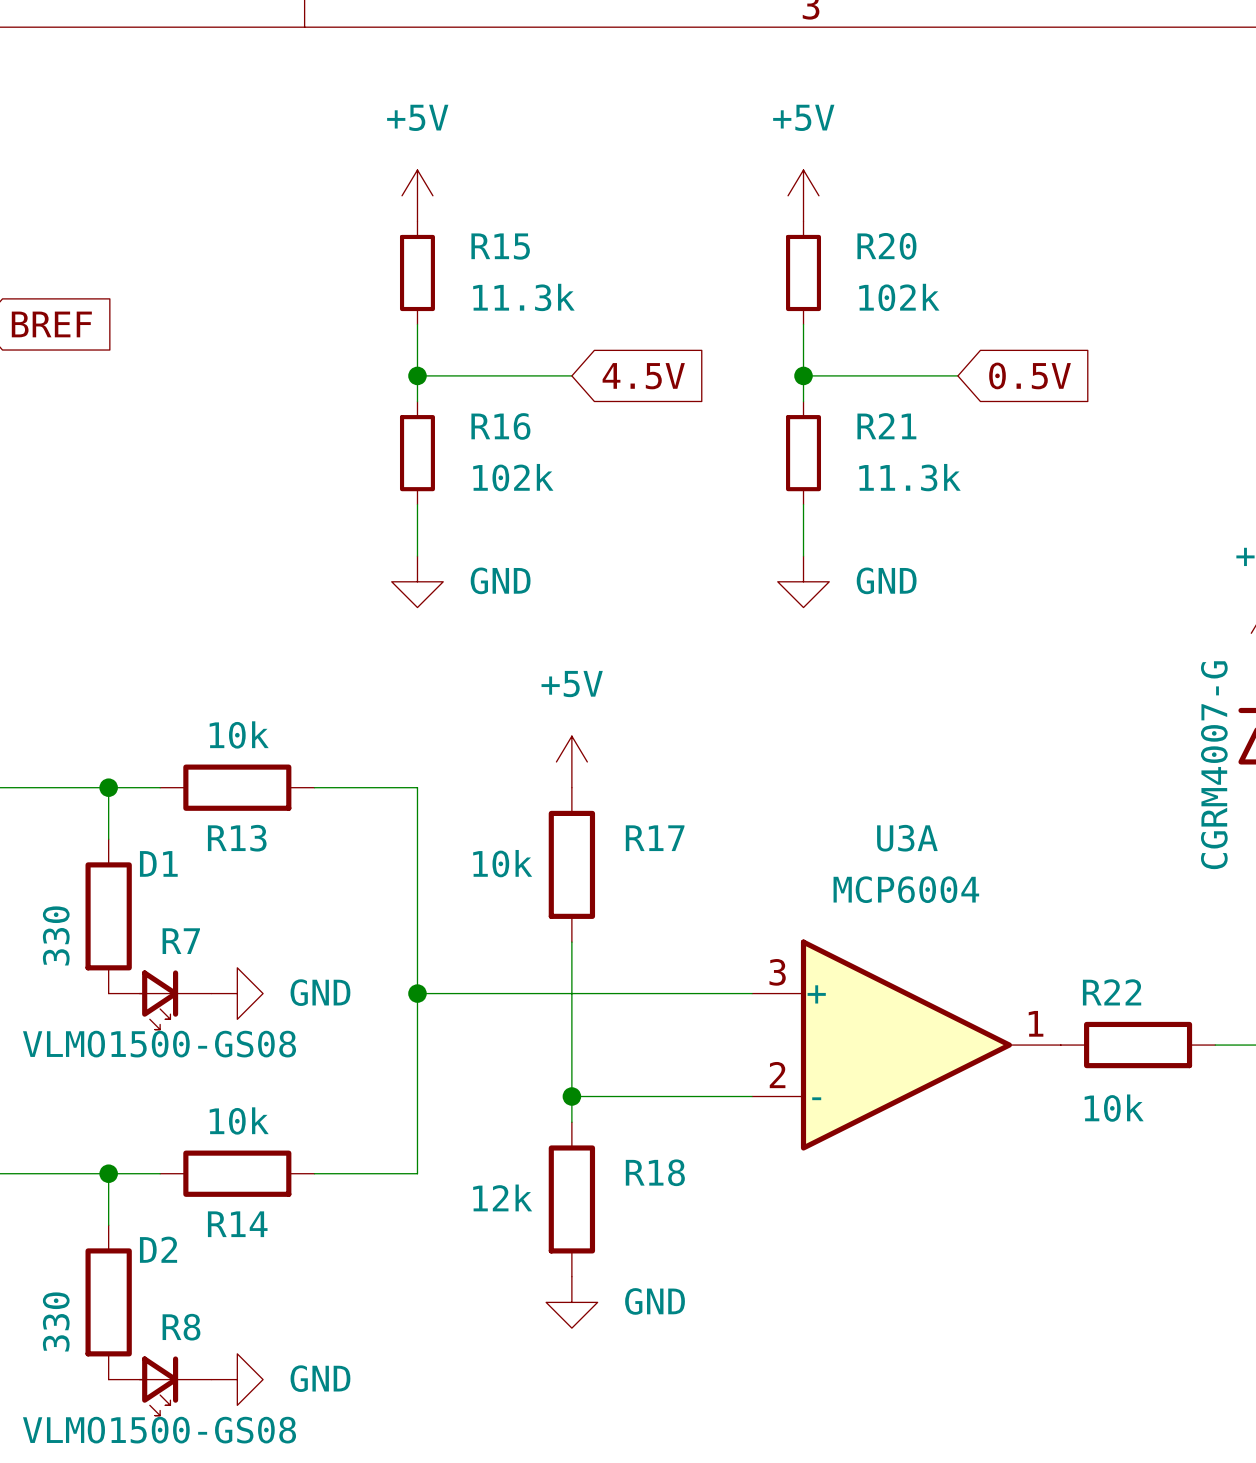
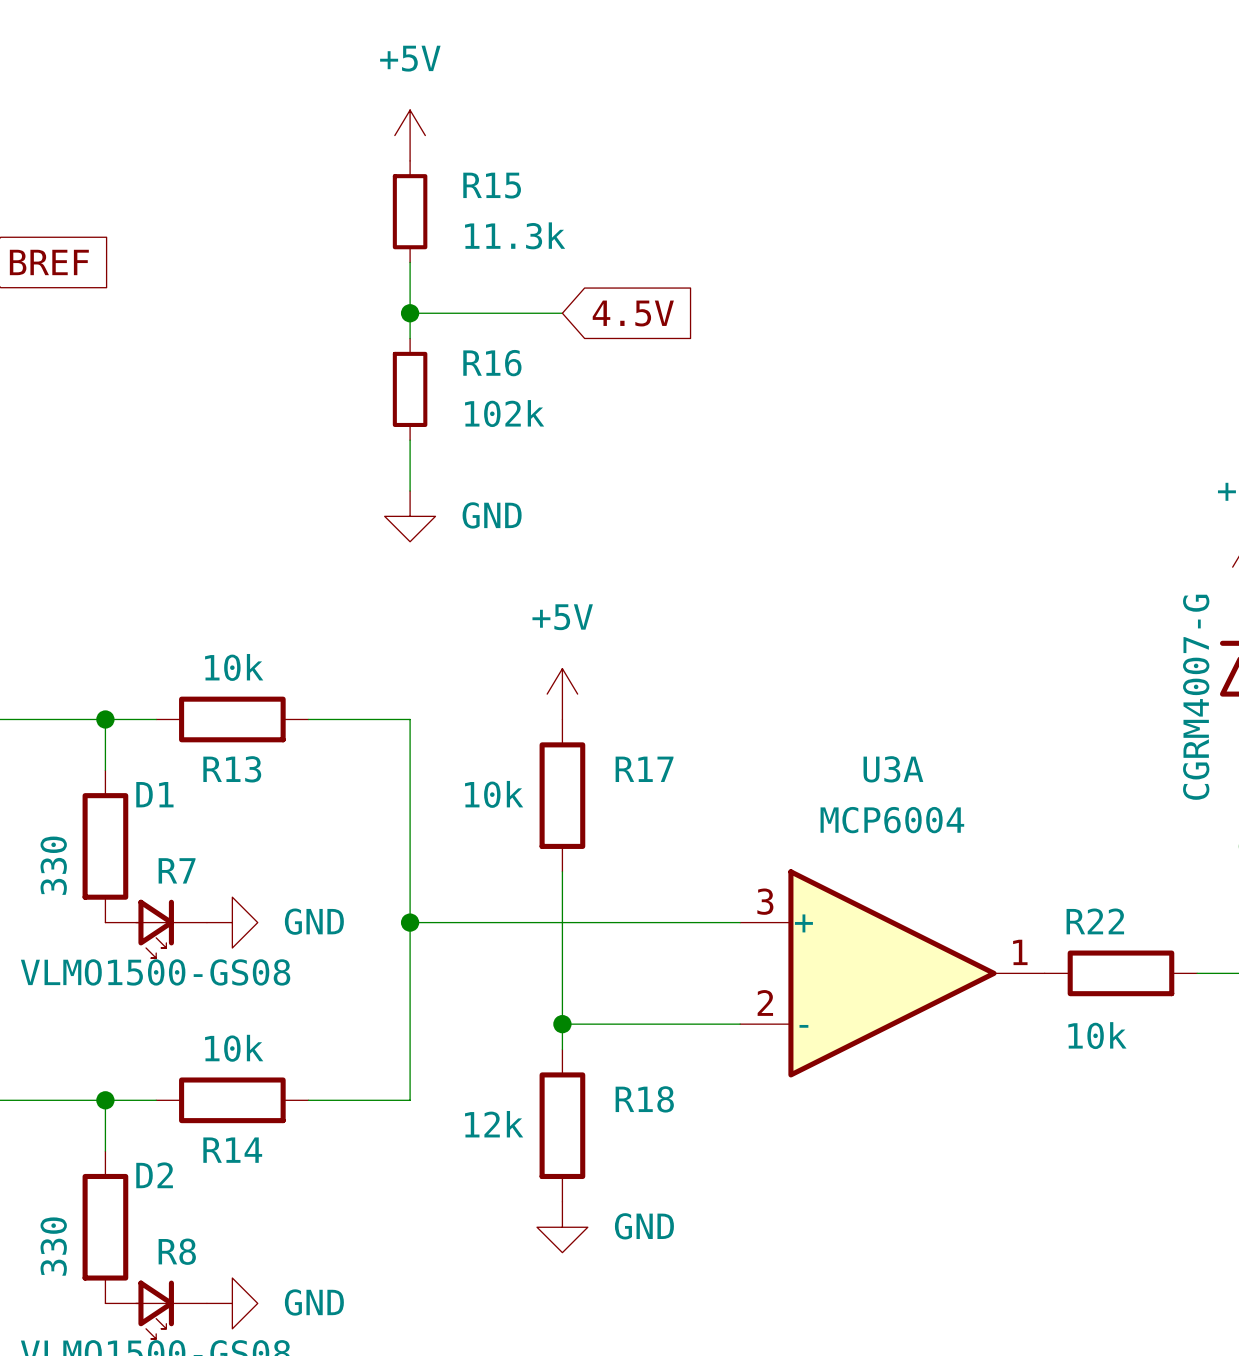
power symbol: +5V (803, 195) -> none
R20: 102k (803, 272) -> none
wire: (803, 324) (803, 401) -> none
wire: (803, 375) (957, 375) -> none
junction: (803, 375) -> none
global label: 0.5V (1030, 375) -> none
R21: 11.3k (803, 453) -> none
wire: (803, 504) (803, 556) -> none
power symbol: GND (803, 581) -> none

